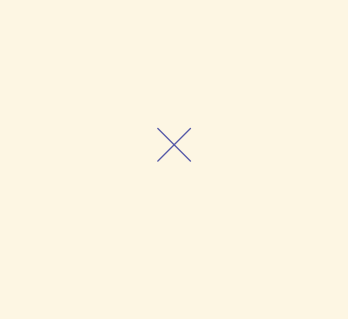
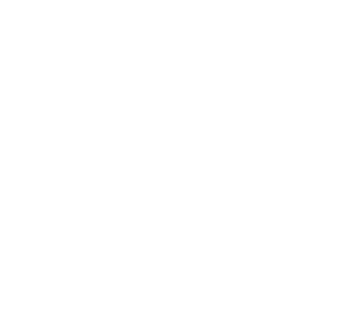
no-connect mark: (174, 144) -> none

